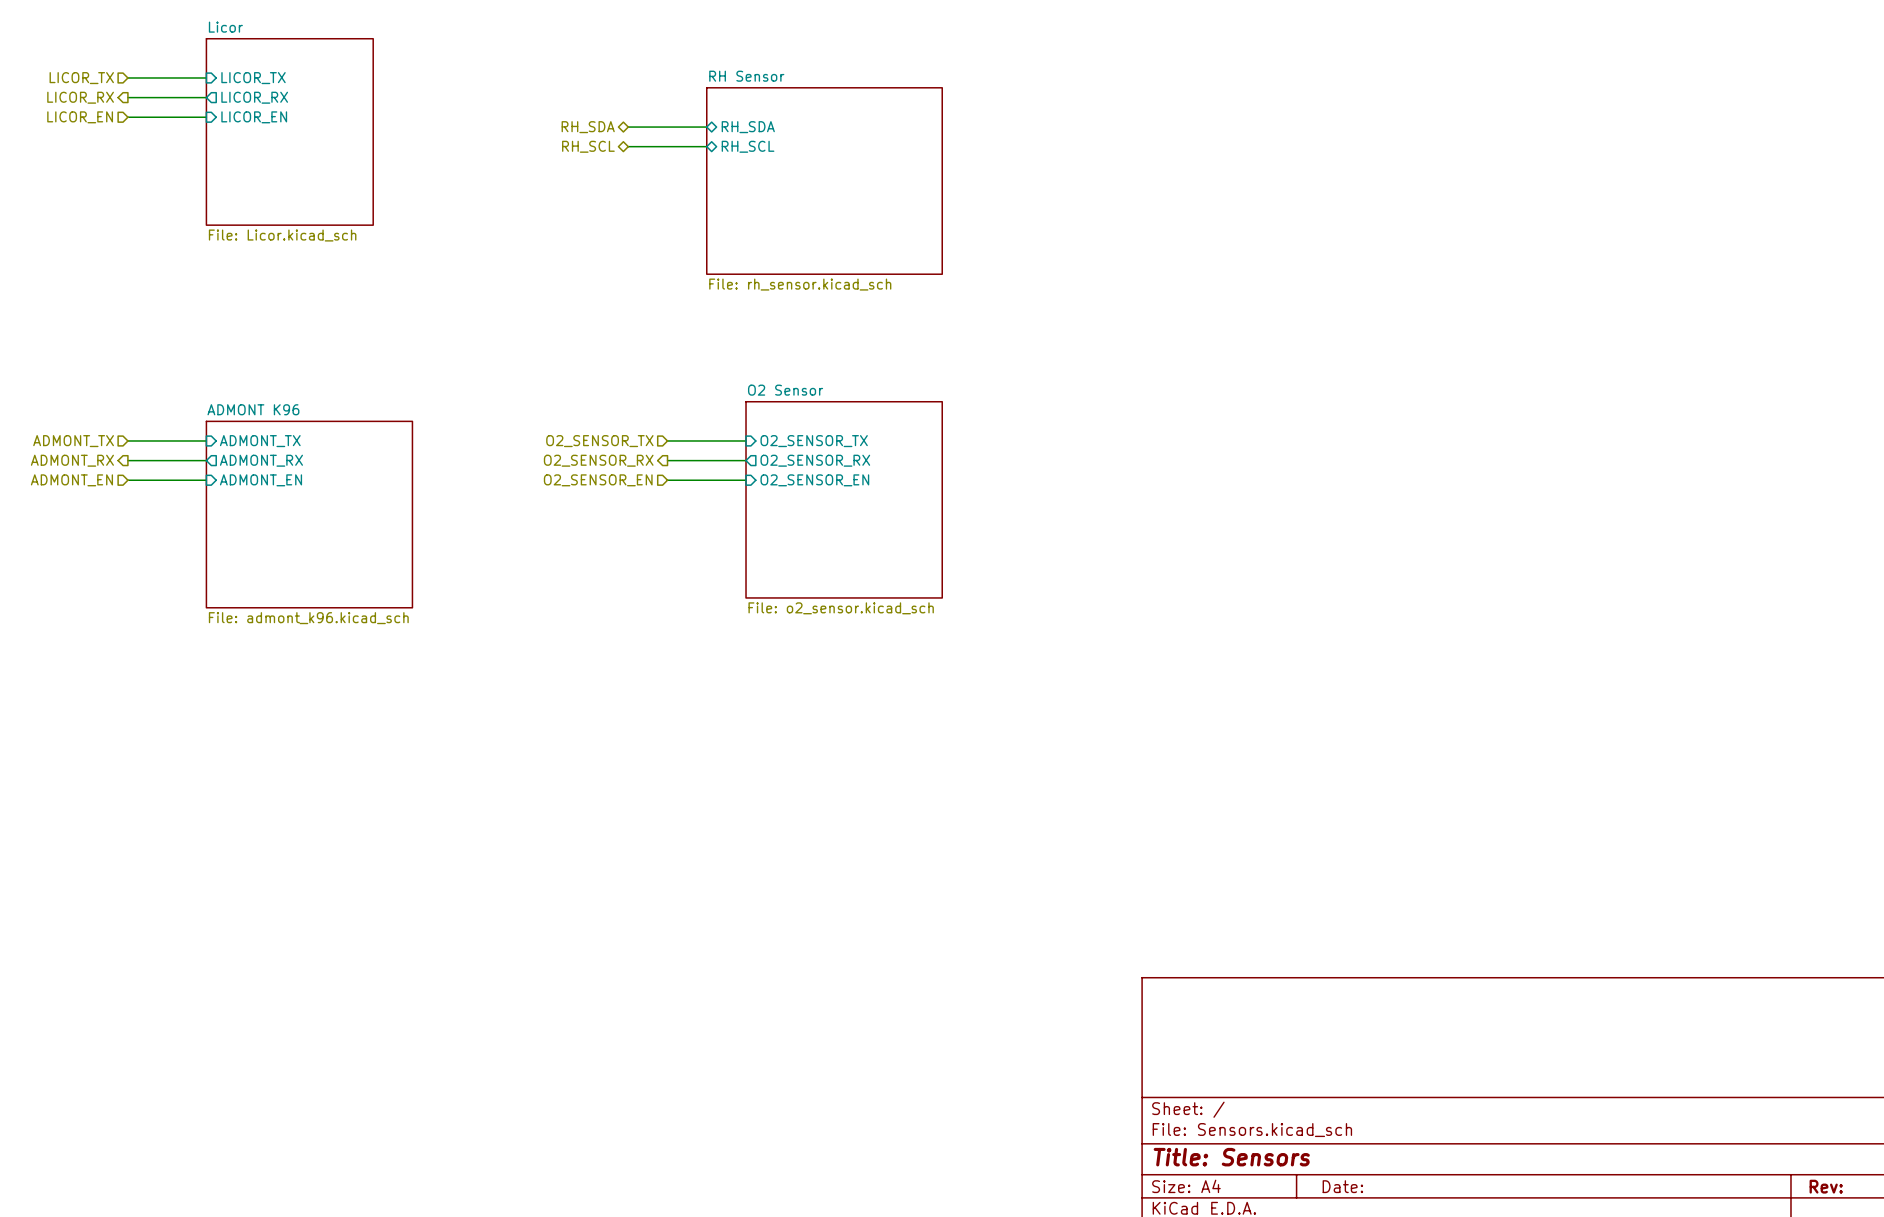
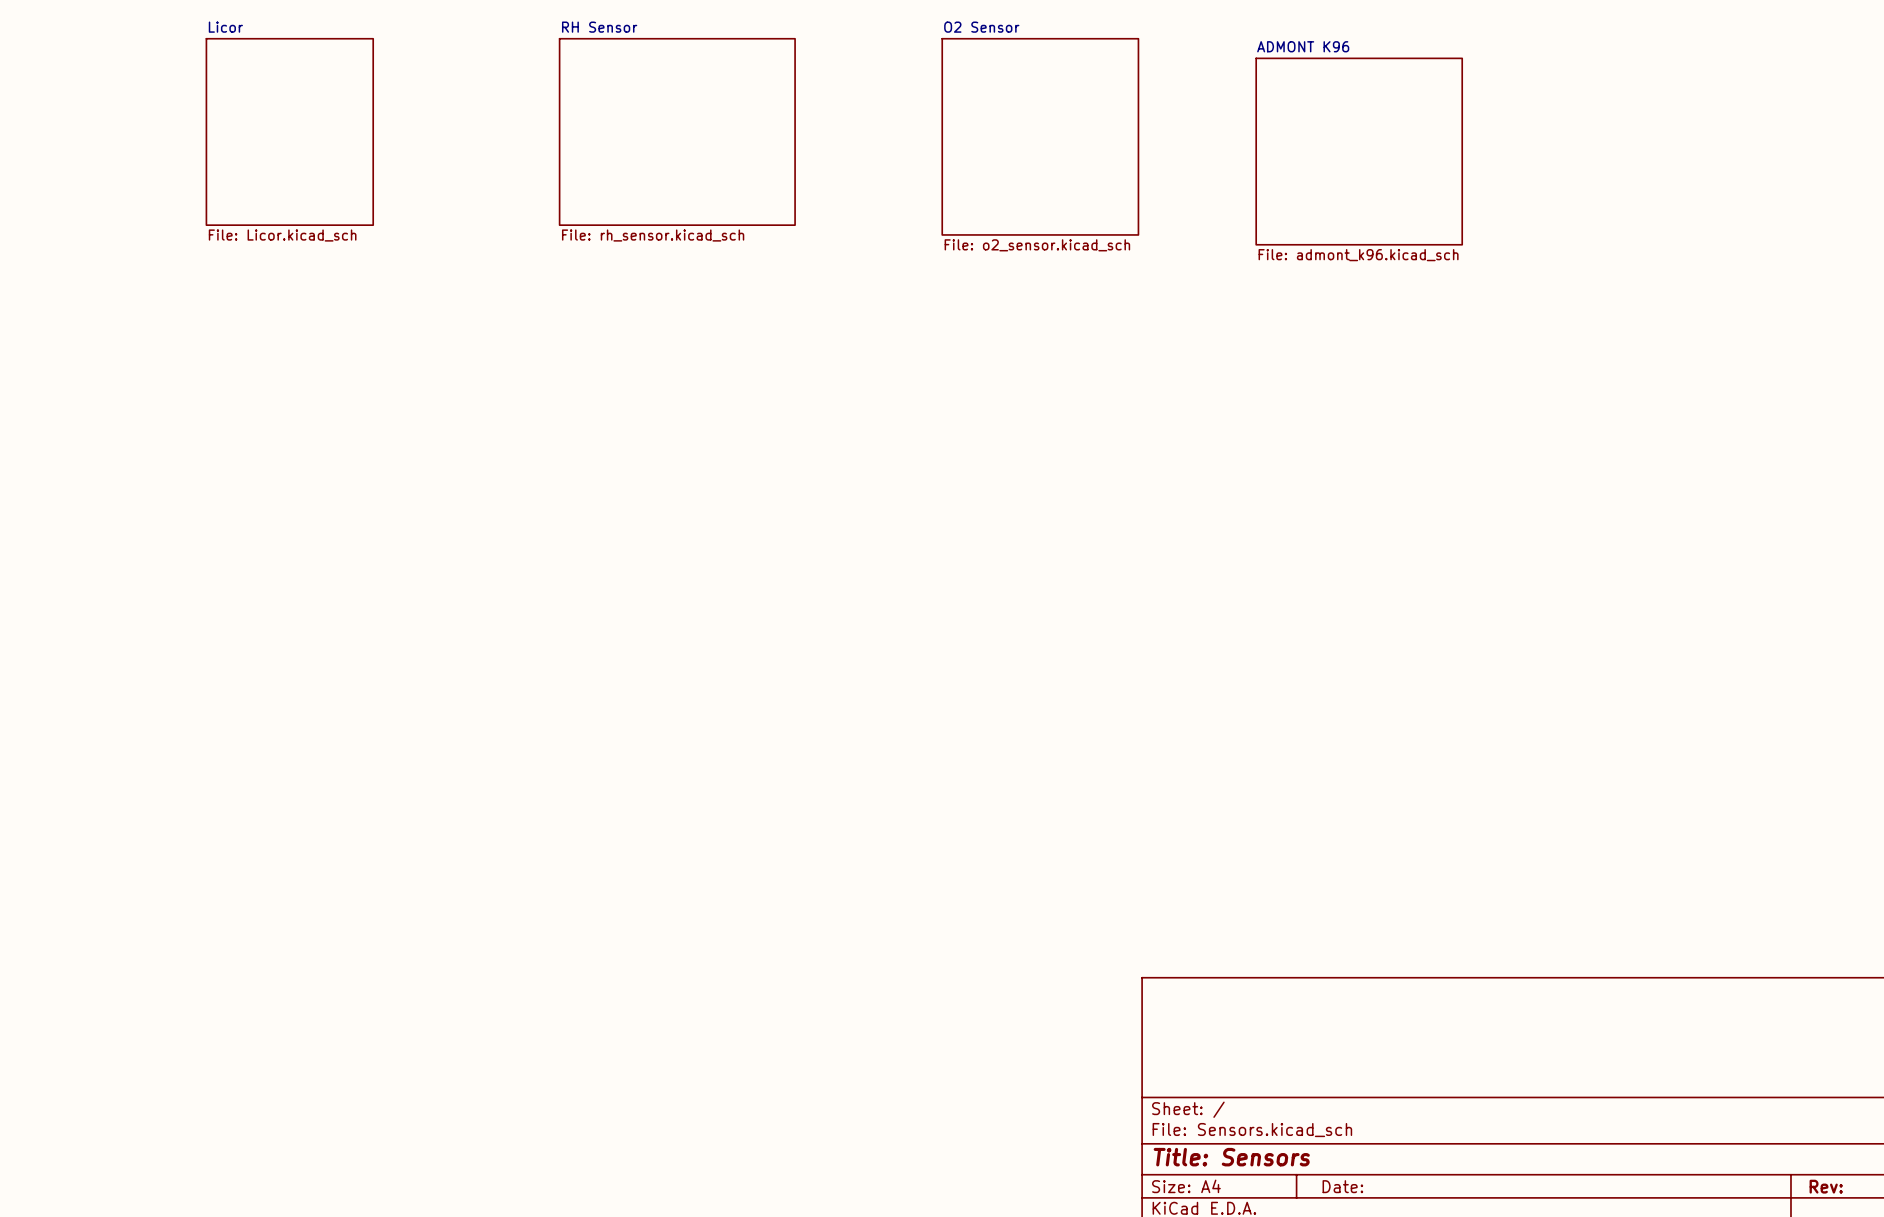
wire: (127, 77) (206, 77) -> none
hierarchical label: LICOR_TX (81, 78) -> none
sheet pin: LICOR_TX (253, 78) -> none
hierarchical label: LICOR_RX (80, 97) -> none
wire: (127, 97) (206, 97) -> none
sheet pin: LICOR_RX (254, 97) -> none
hierarchical label: LICOR_EN (80, 117) -> none
wire: (127, 117) (206, 117) -> none
sheet pin: LICOR_EN (254, 117) -> none
hierarchical label: RH_SDA (588, 127) -> none
wire: (628, 127) (706, 127) -> none
sheet pin: RH_SDA (748, 127) -> none
hierarchical label: RH_SCL (588, 146) -> none
wire: (628, 146) (706, 146) -> none
sheet pin: RH_SCL (748, 146) -> none
sheet RH Sensor position: (824, 181) -> (677, 131)
wire: (127, 440) (206, 440) -> none
wire: (667, 440) (746, 440) -> none
hierarchical label: ADMONT_TX (73, 441) -> none
sheet pin: ADMONT_TX (260, 441) -> none
hierarchical label: O2_SENSOR_TX (599, 441) -> none
sheet pin: O2_SENSOR_TX (814, 441) -> none
hierarchical label: ADMONT_RX (72, 460) -> none
wire: (127, 460) (206, 460) -> none
sheet pin: ADMONT_RX (261, 460) -> none
hierarchical label: O2_SENSOR_RX (598, 460) -> none
wire: (667, 460) (746, 460) -> none
sheet pin: O2_SENSOR_RX (815, 460) -> none
hierarchical label: ADMONT_EN (71, 480) -> none
wire: (127, 480) (206, 480) -> none
sheet pin: ADMONT_EN (260, 480) -> none
hierarchical label: O2_SENSOR_EN (598, 480) -> none
wire: (667, 480) (746, 480) -> none
sheet pin: O2_SENSOR_EN (814, 480) -> none
sheet O2 Sensor position: (844, 499) -> (1040, 136)
sheet ADMONT K96 position: (309, 514) -> (1359, 151)

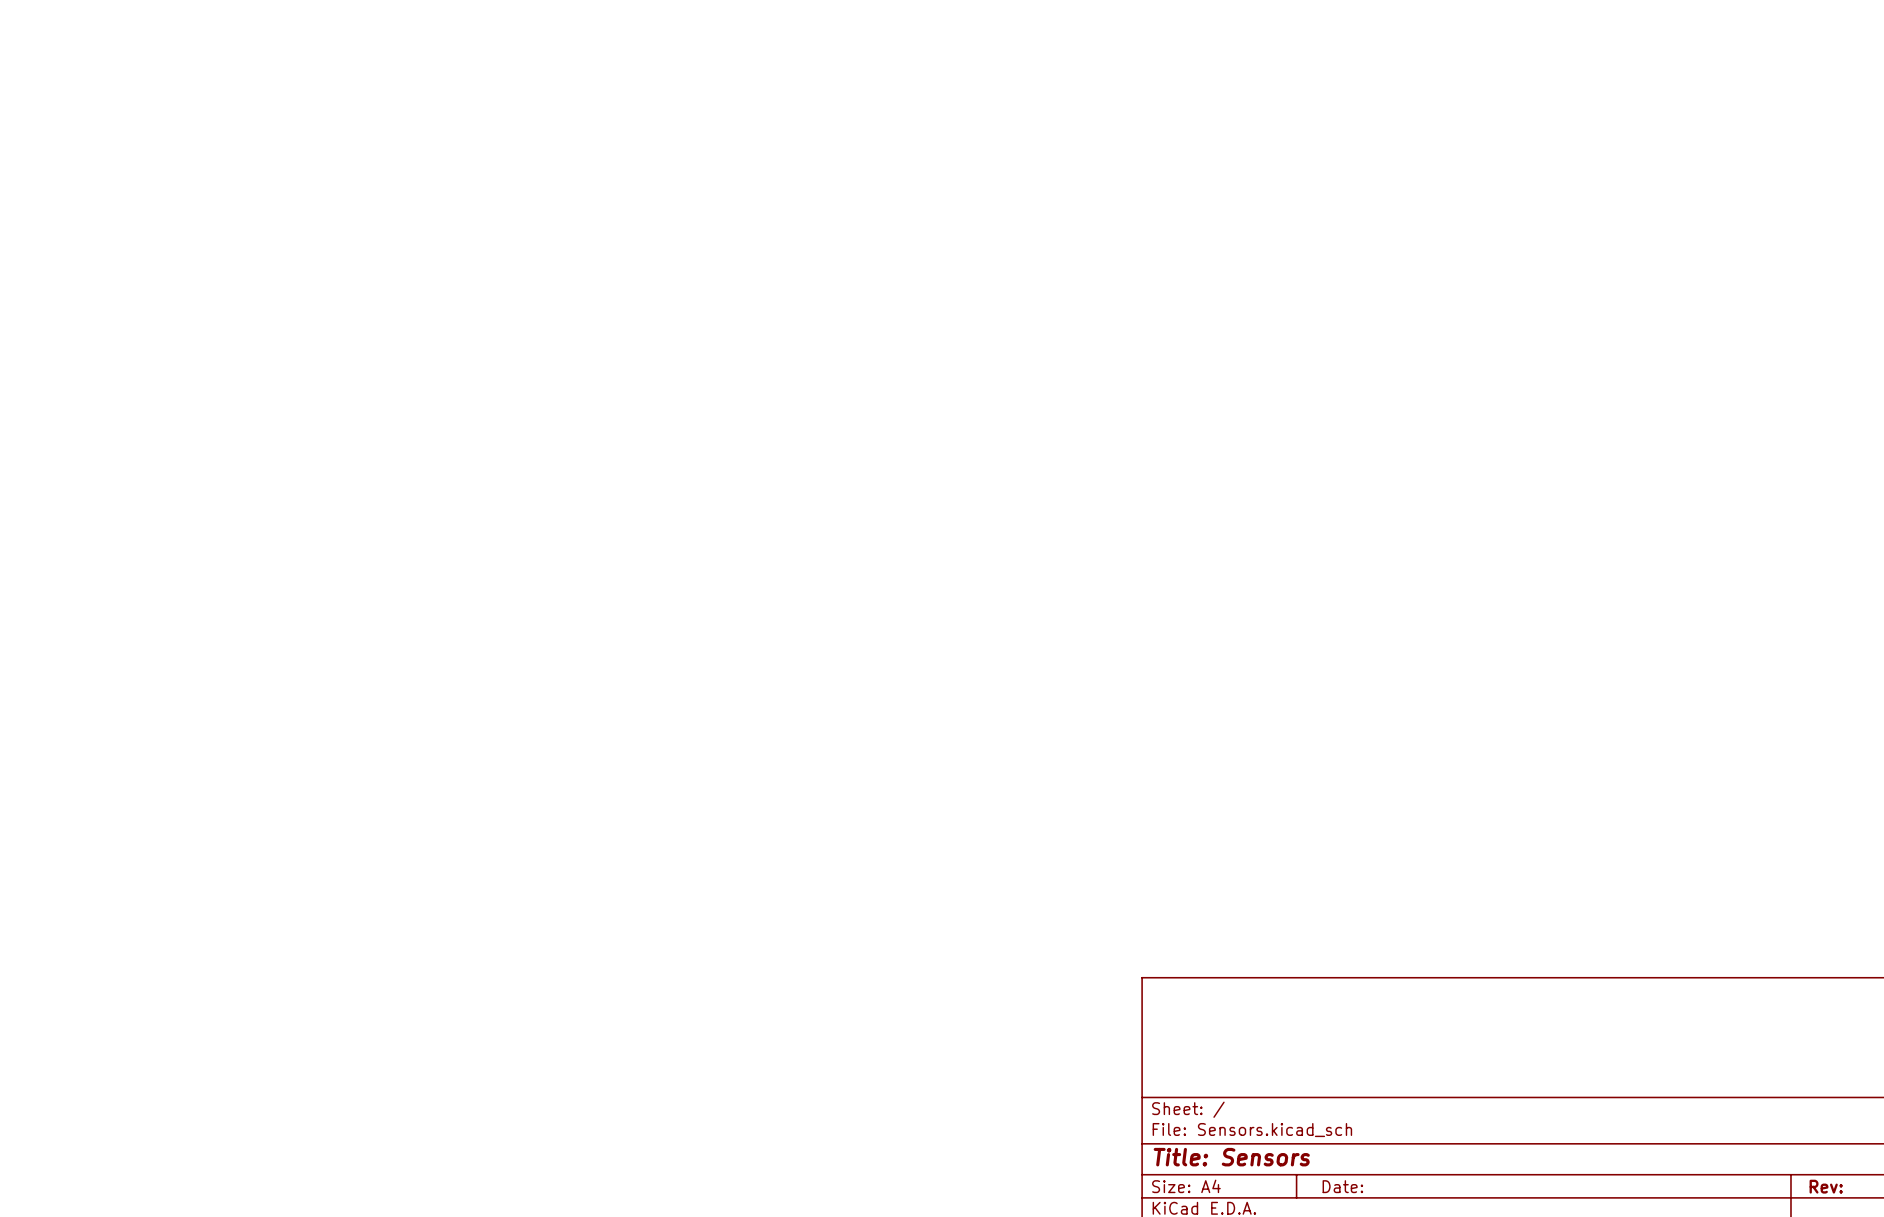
sheet Licor: File: Licor.kicad_sch (289, 131) -> none
sheet RH Sensor: File: rh_sensor.kicad_sch (677, 131) -> none
sheet O2 Sensor: File: o2_sensor.kicad_sch (1040, 136) -> none
sheet ADMONT K96: File: admont_k96.kicad_sch (1359, 151) -> none

